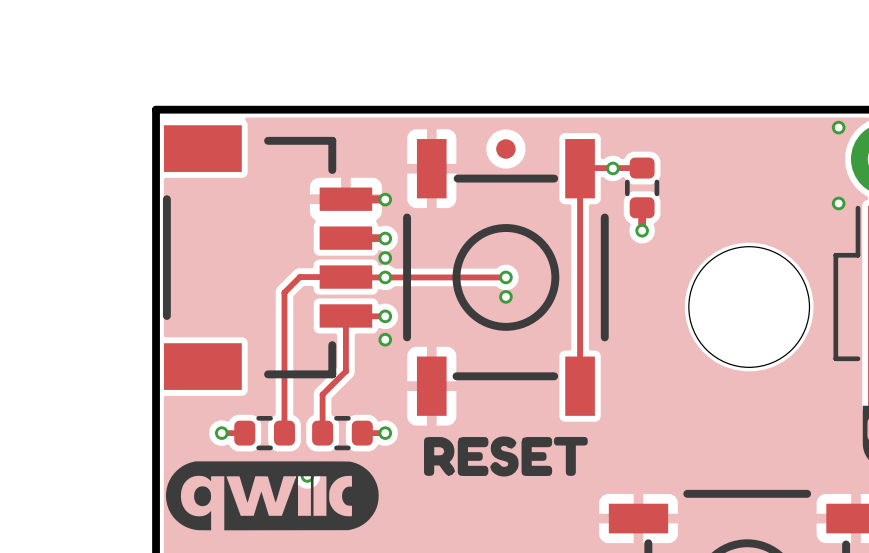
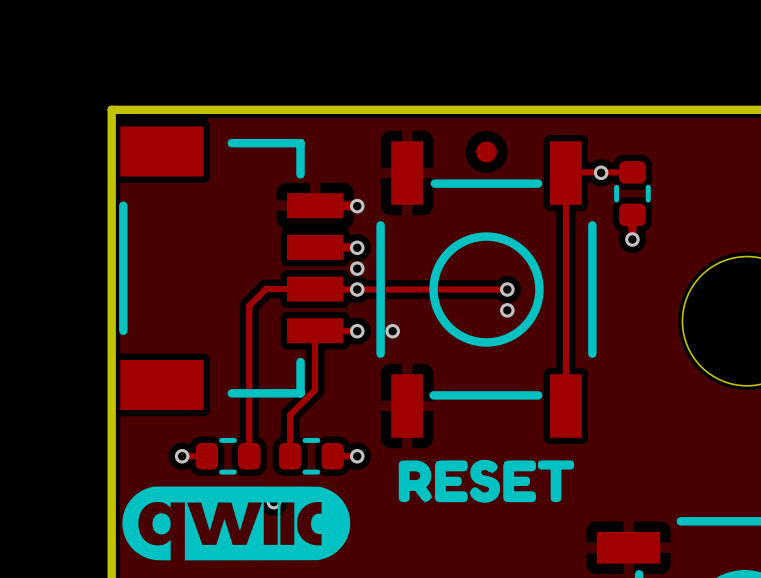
track: none -> (486, 289) (507, 289)
via: (505, 277) -> none
via: none -> (507, 289)
via: (505, 296) -> none
via: none -> (507, 310)
via position: (385, 339) -> (392, 331)

